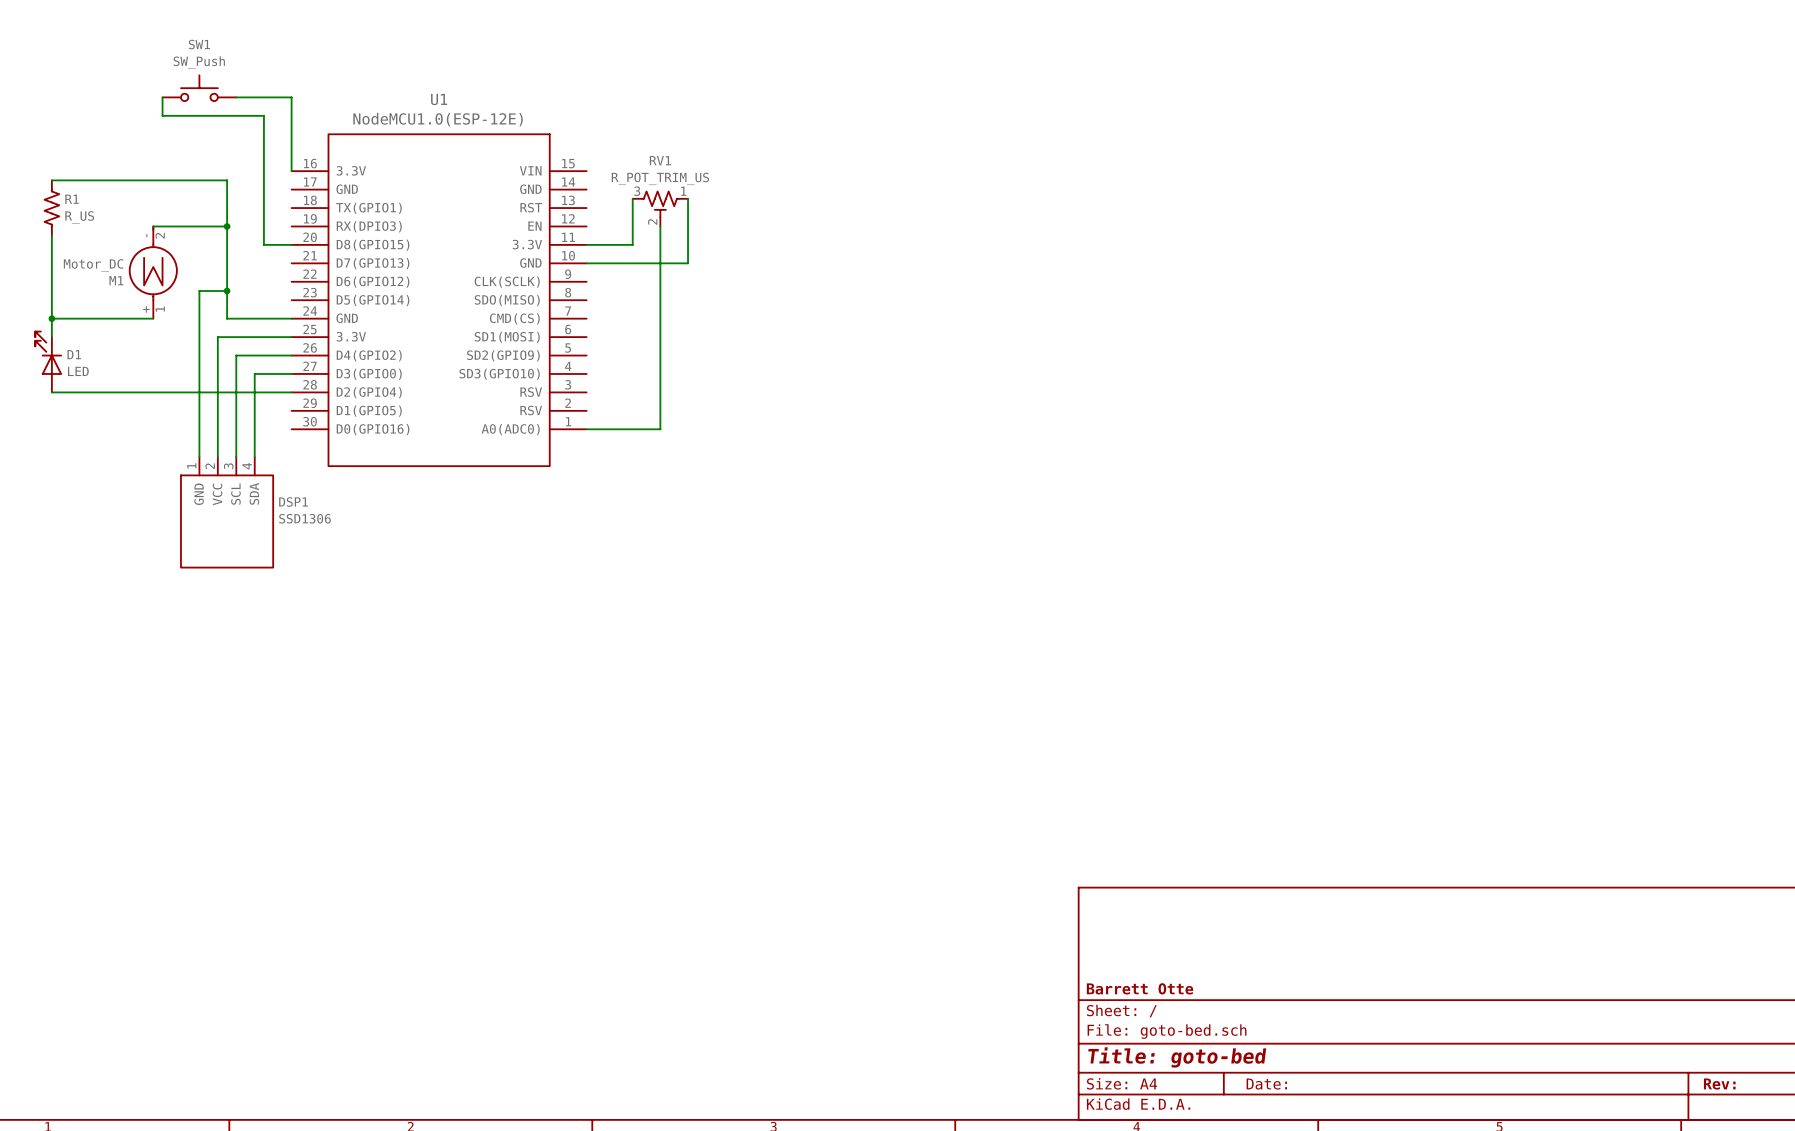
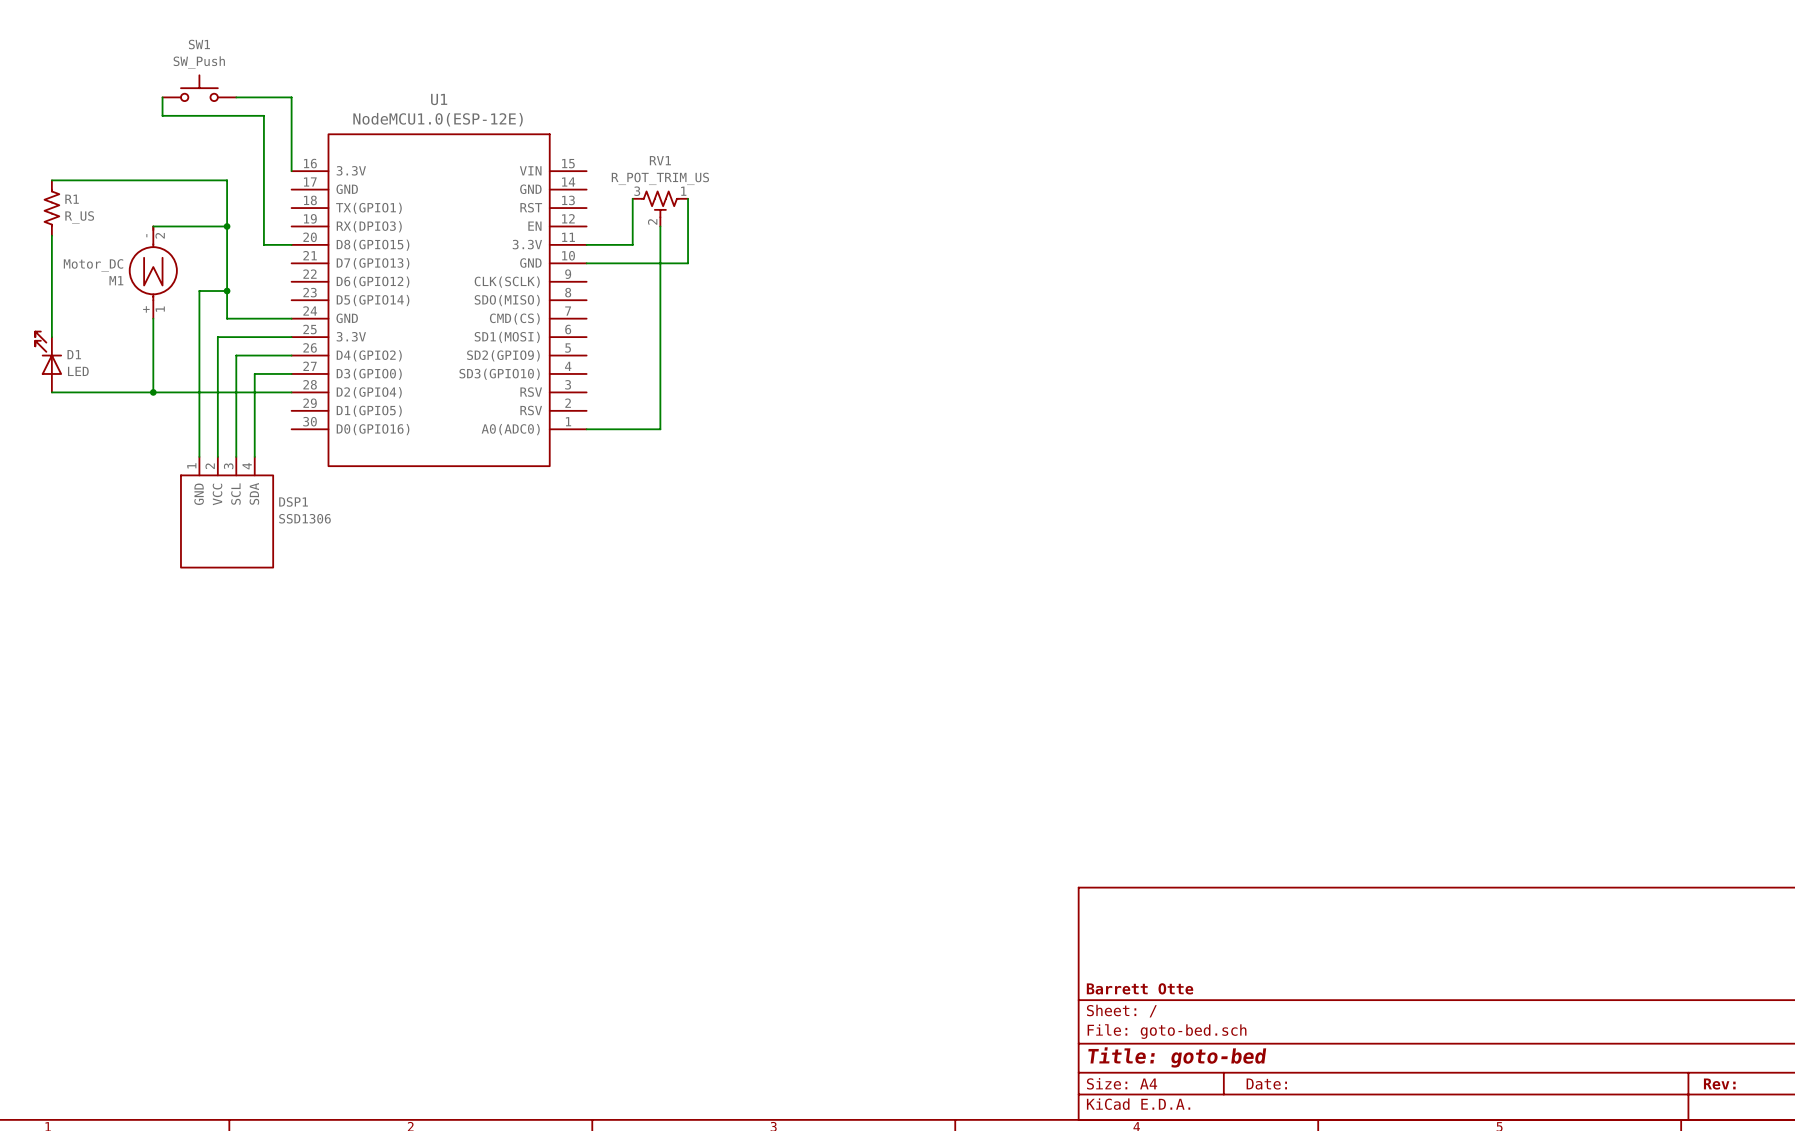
wire: (51, 318) (153, 318) -> (153, 392) (153, 318)
junction: (51, 318) -> none
junction: none -> (153, 392)

